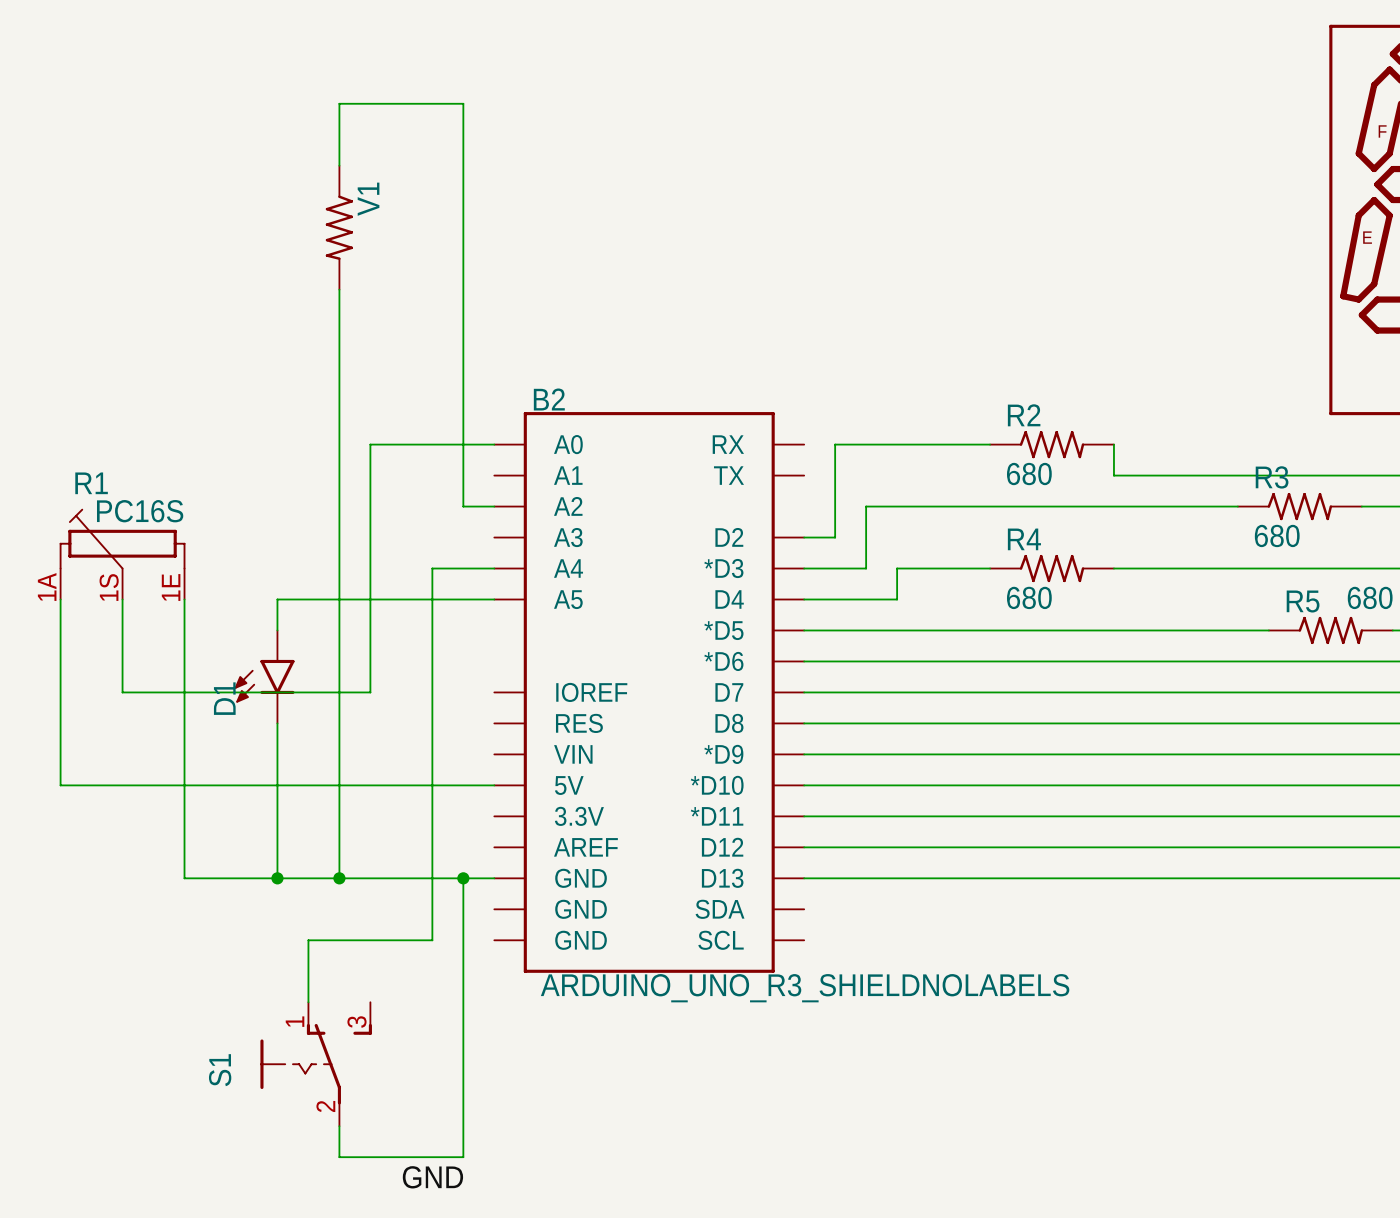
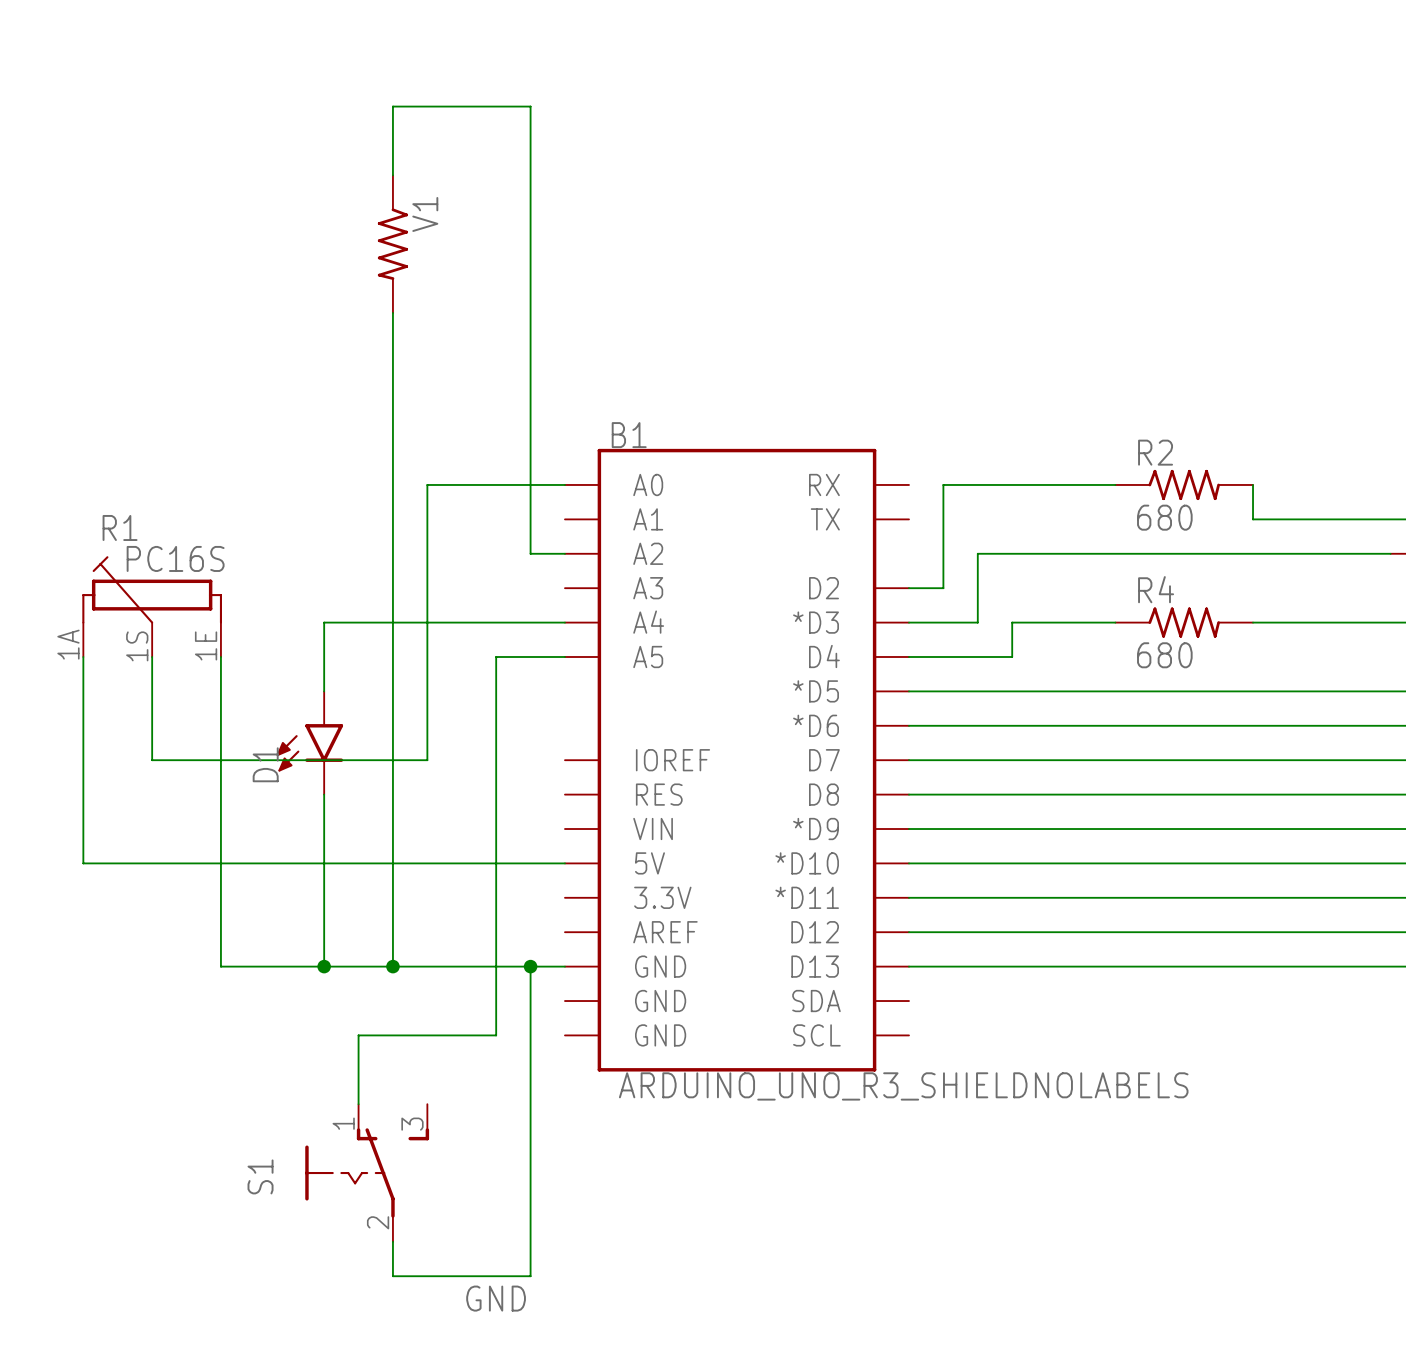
B2 name: B2 (549, 399) -> B1 (629, 435)
wire: (432, 568) (432, 599) (277, 599) -> (496, 622) (324, 622) (324, 656)

